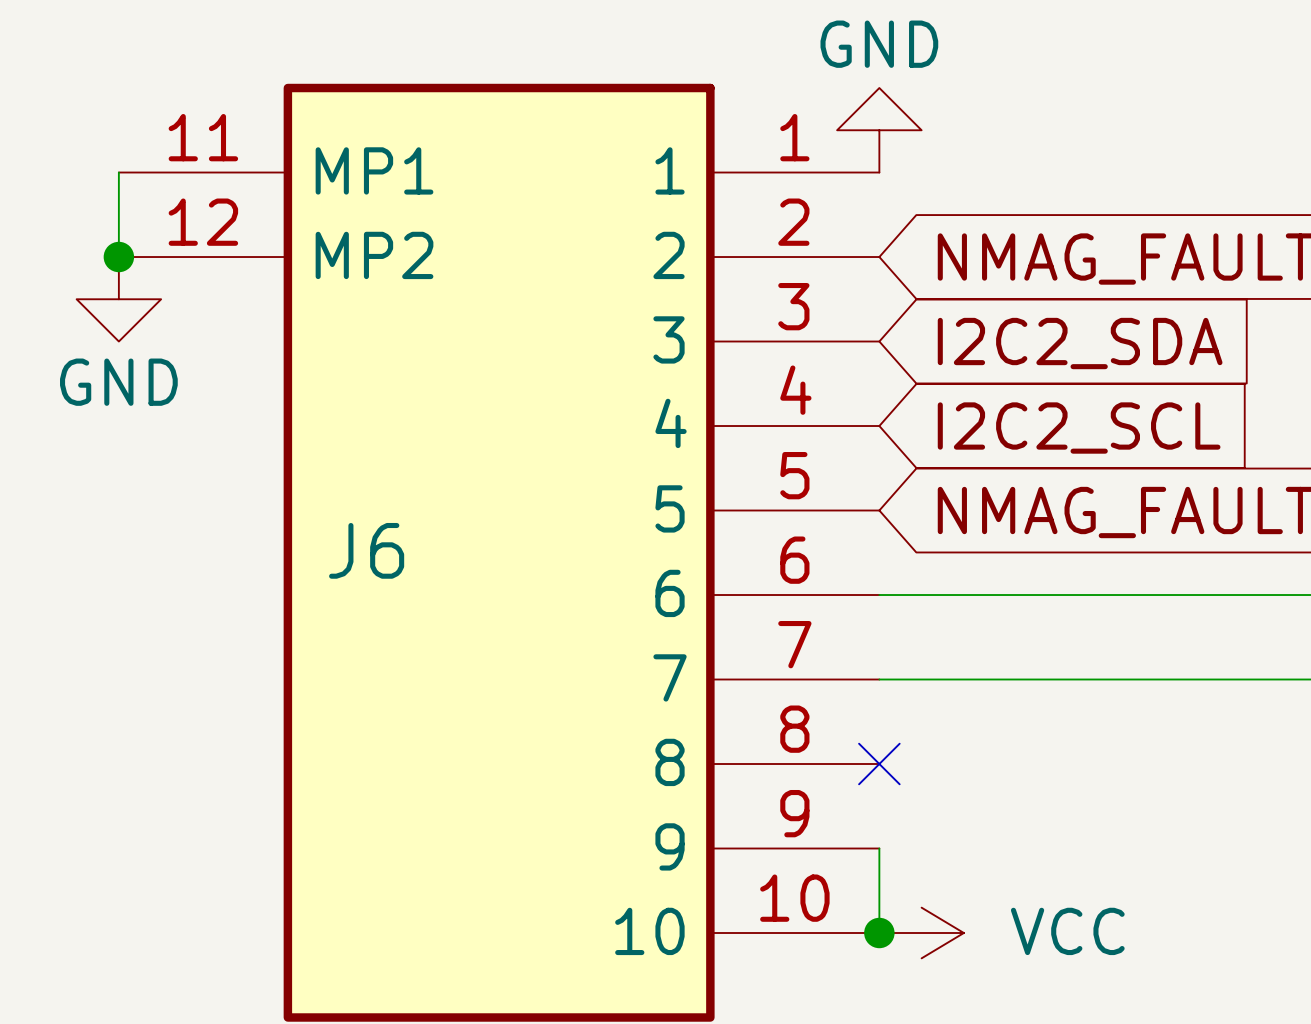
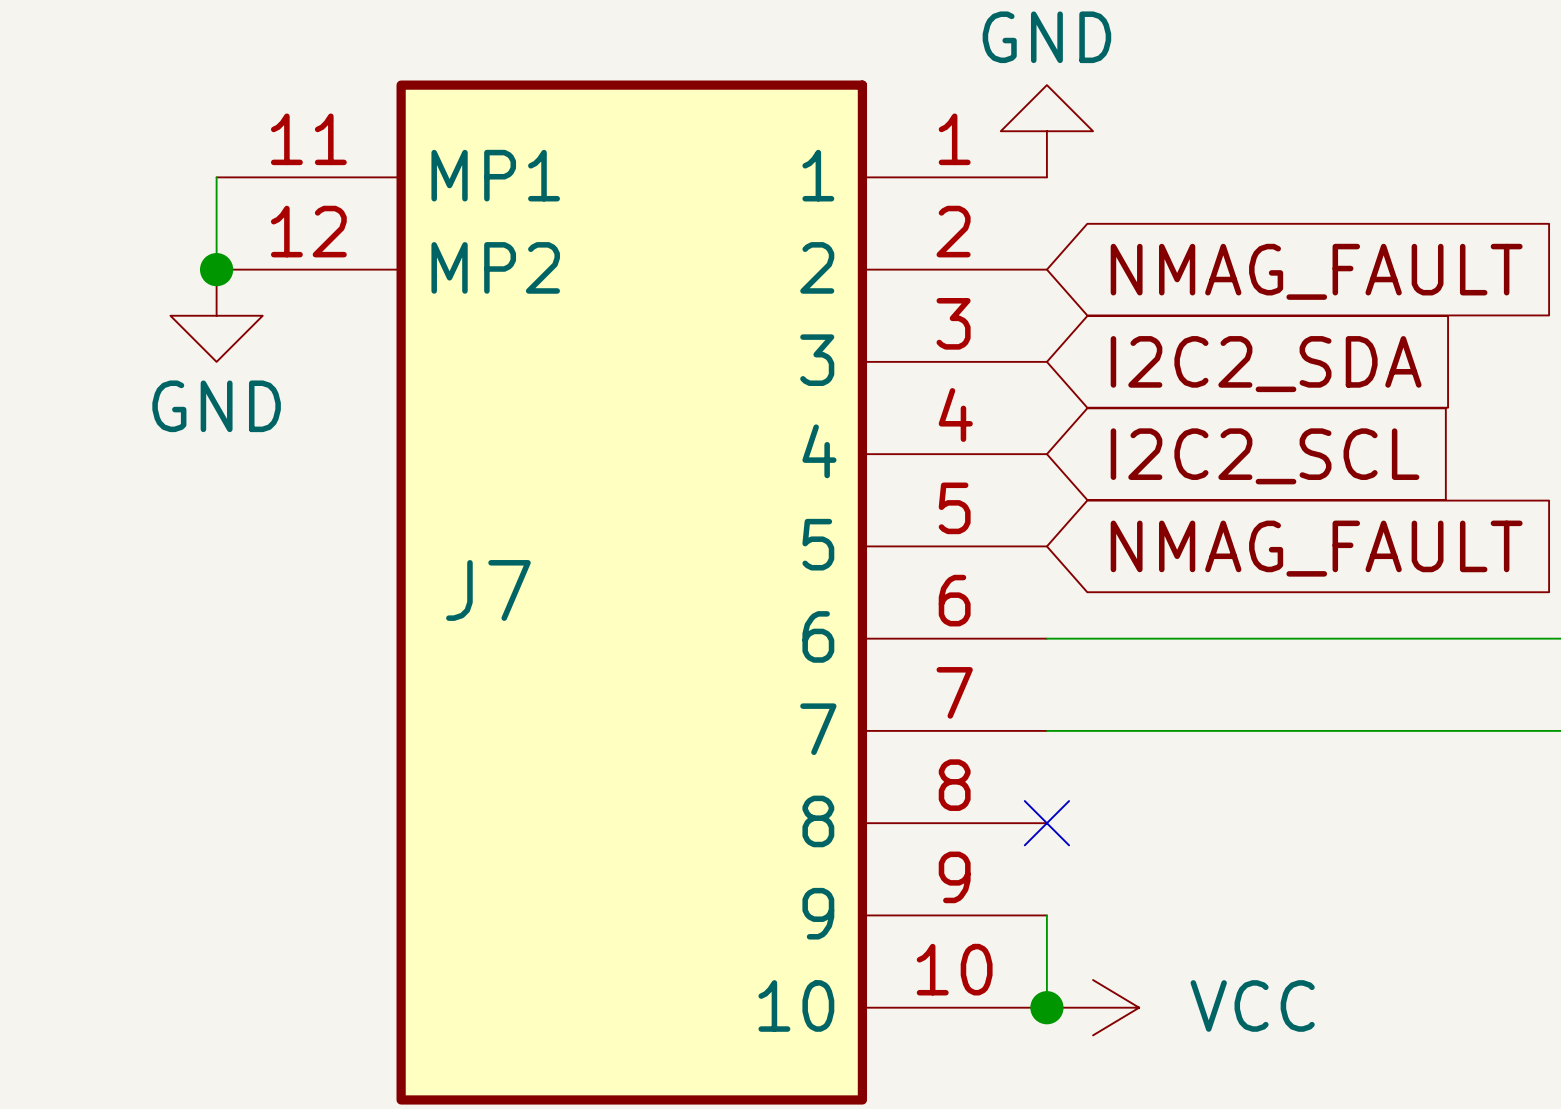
J6 name: J6 (366, 550) -> J7 (488, 590)

